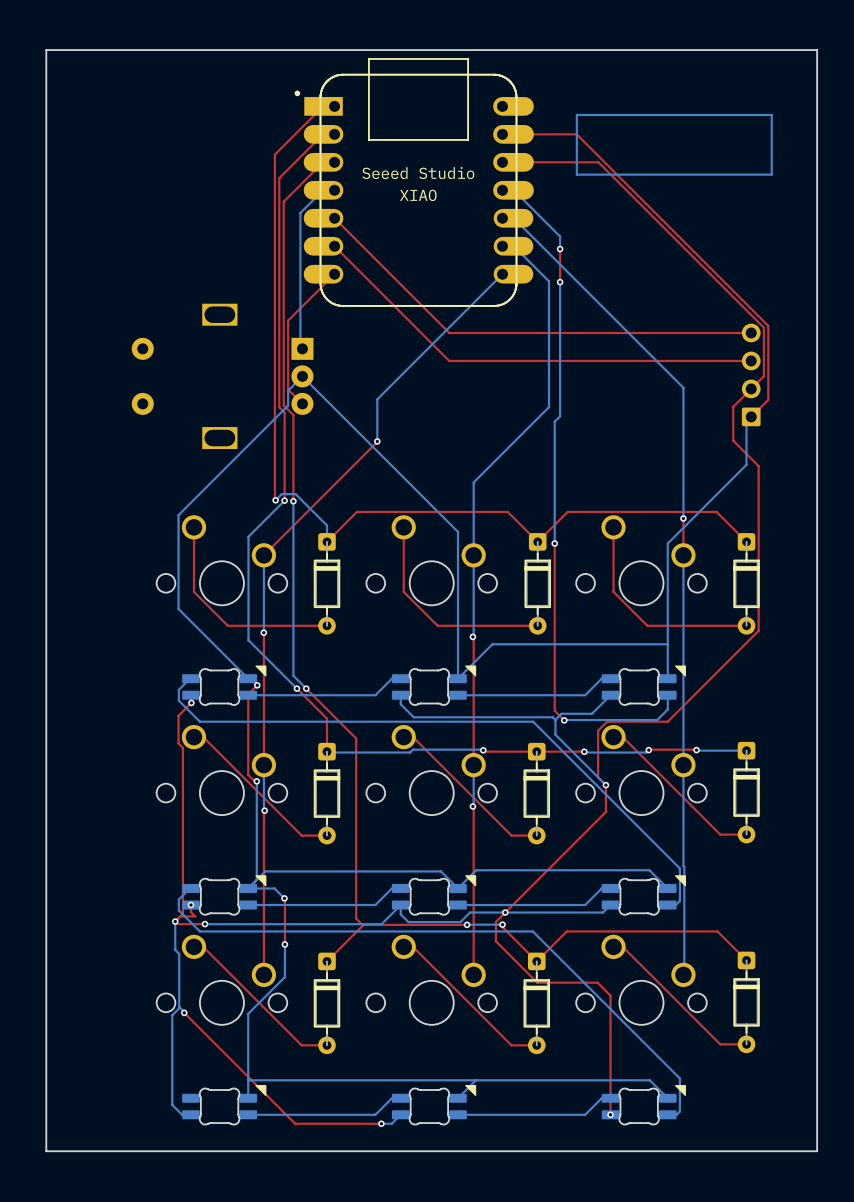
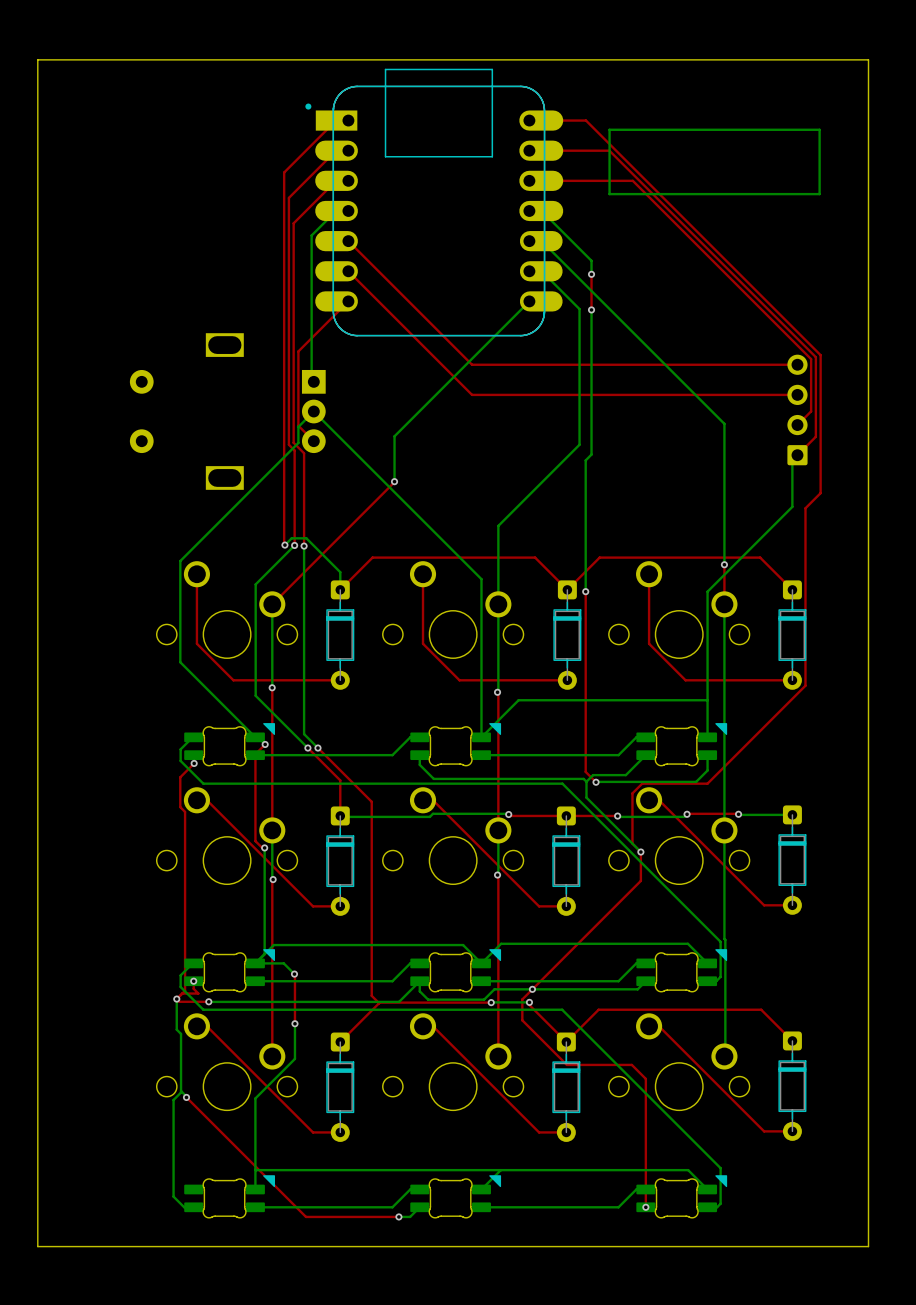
part text: Seeed Studio (418, 173) -> none
part text: XIAO (418, 195) -> none
top track: (751, 388) (733, 406) (733, 440) (758, 466) -> (529, 120) (586, 120) (820, 355) (820, 493) (805, 508)

